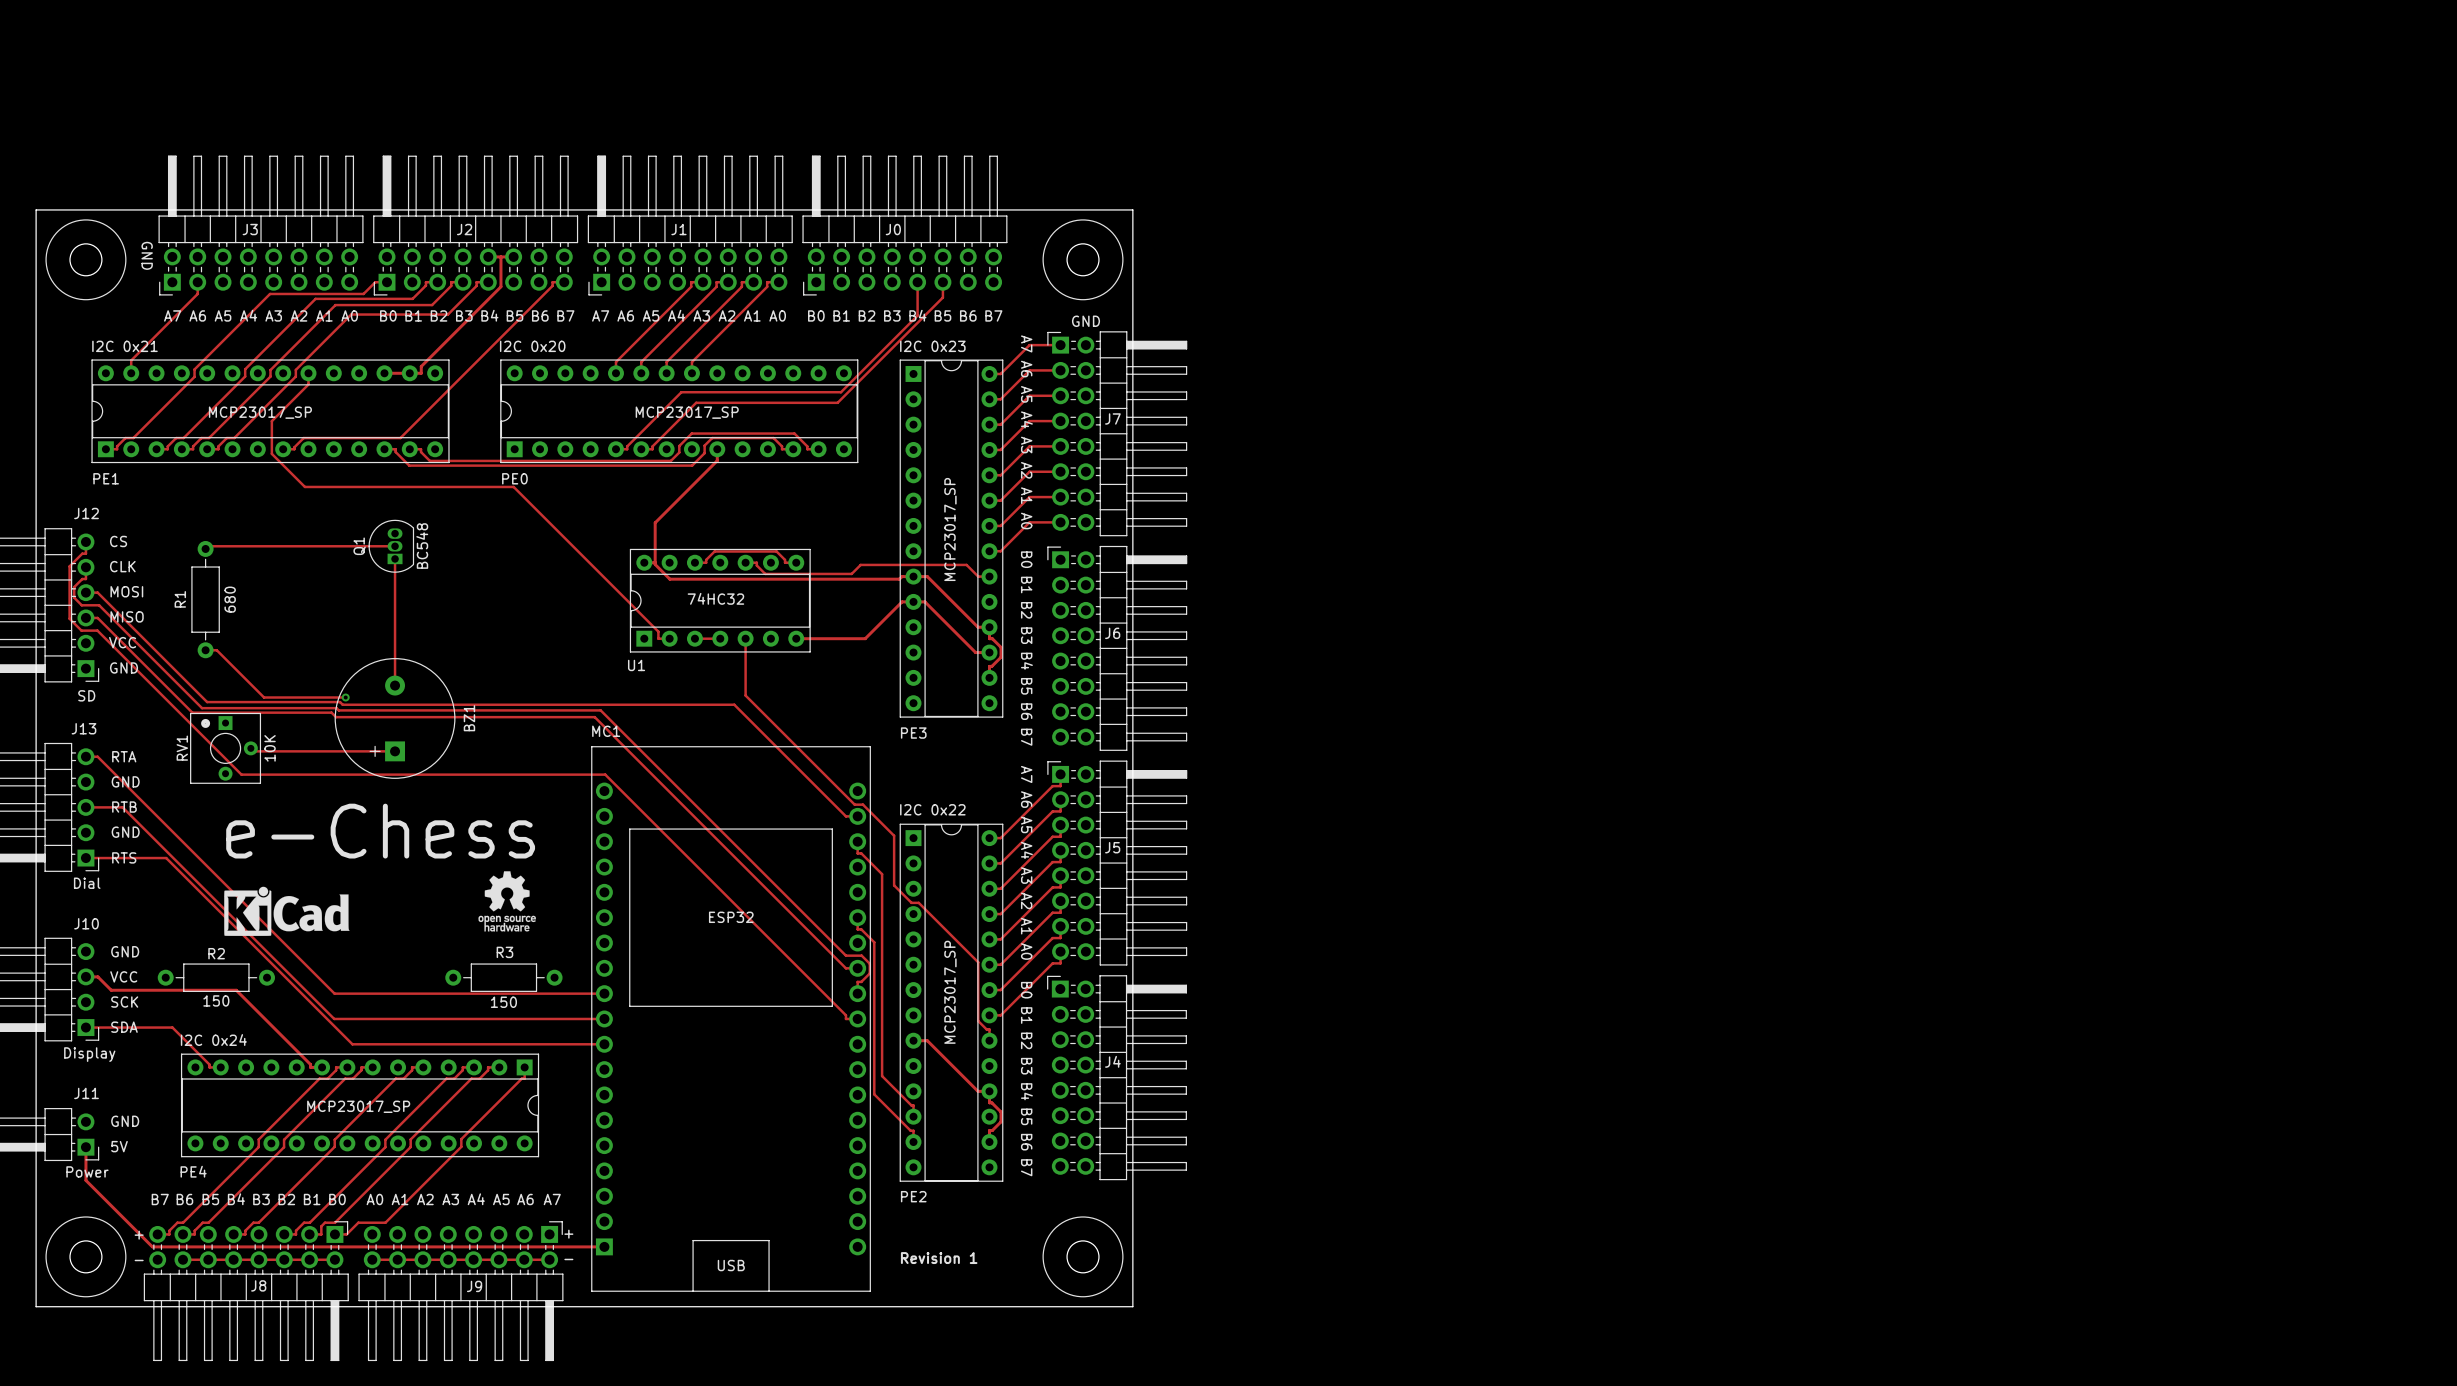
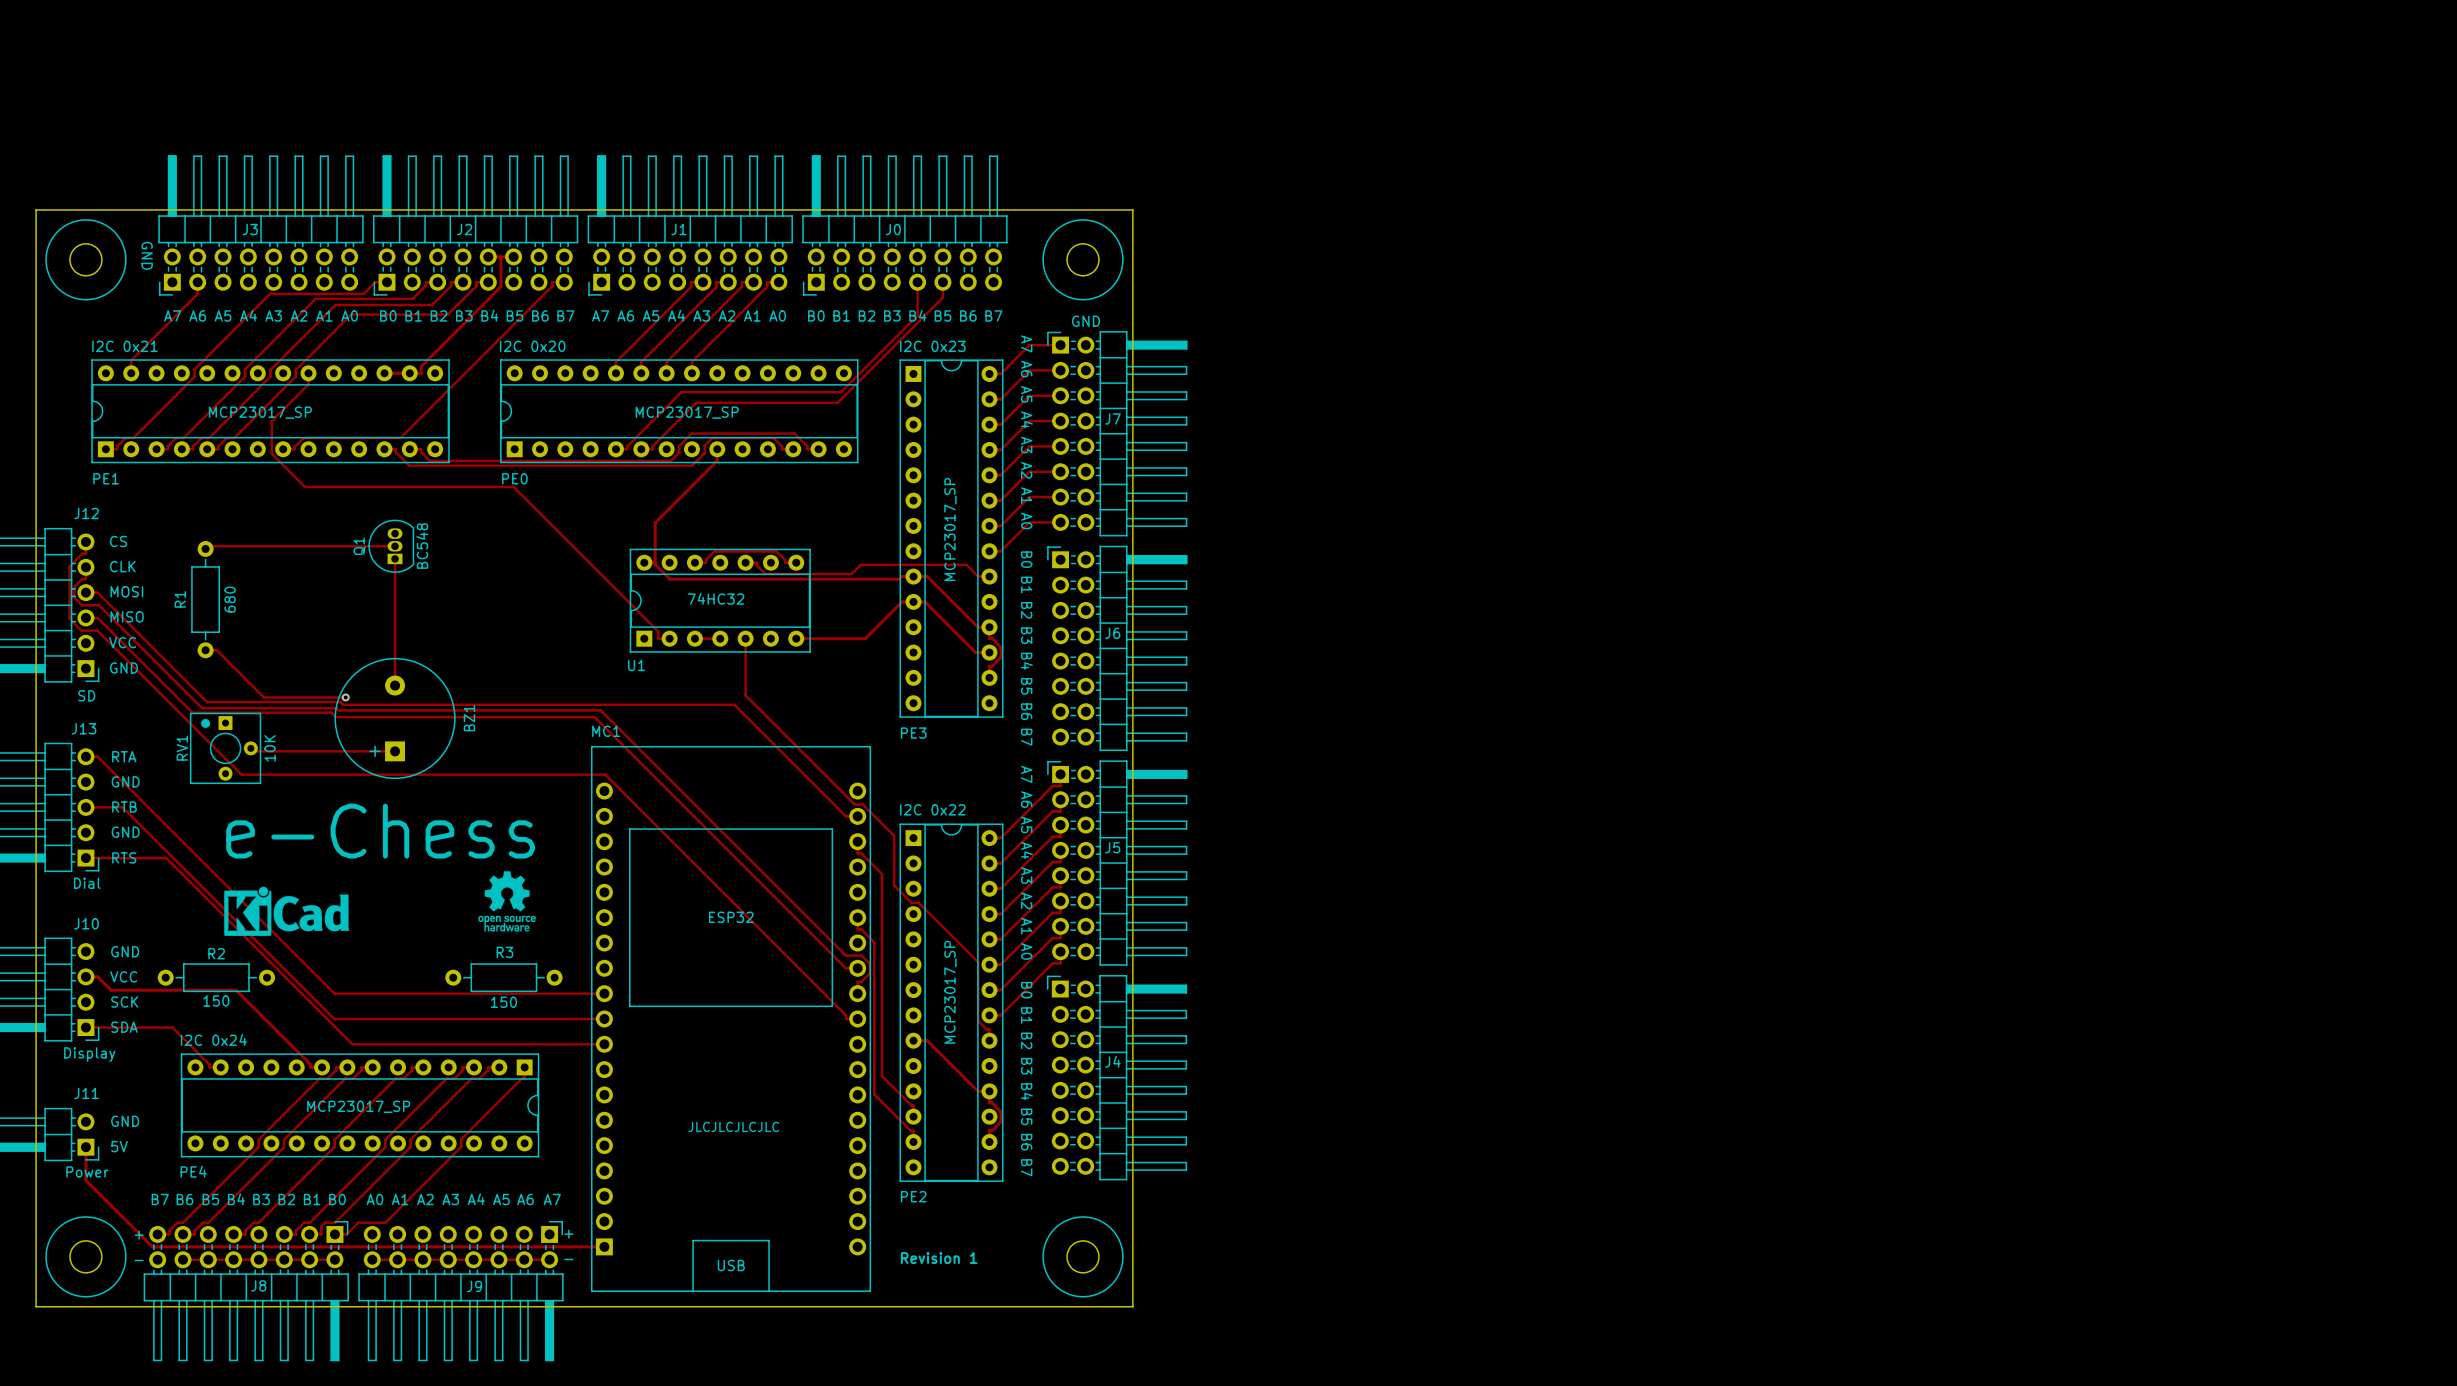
text: none -> JLCJLCJLCJLC (733, 1126)

